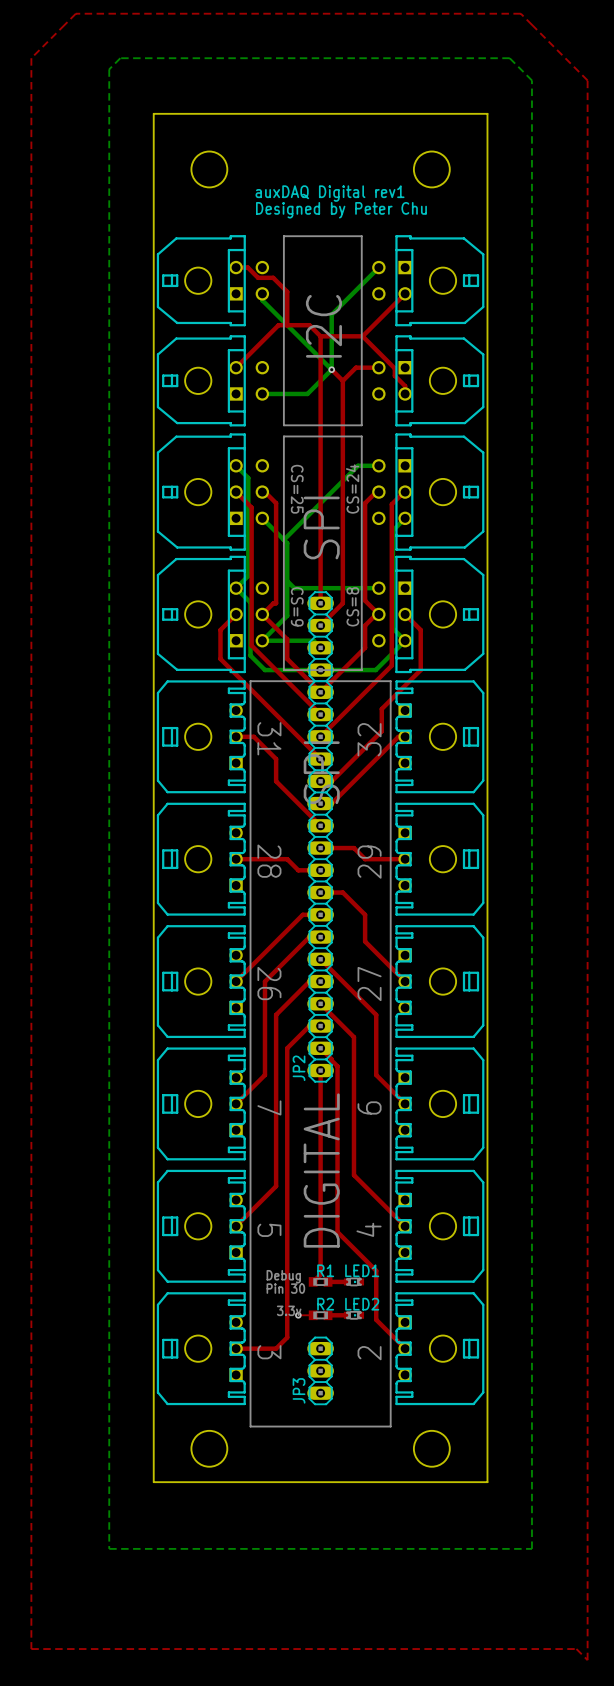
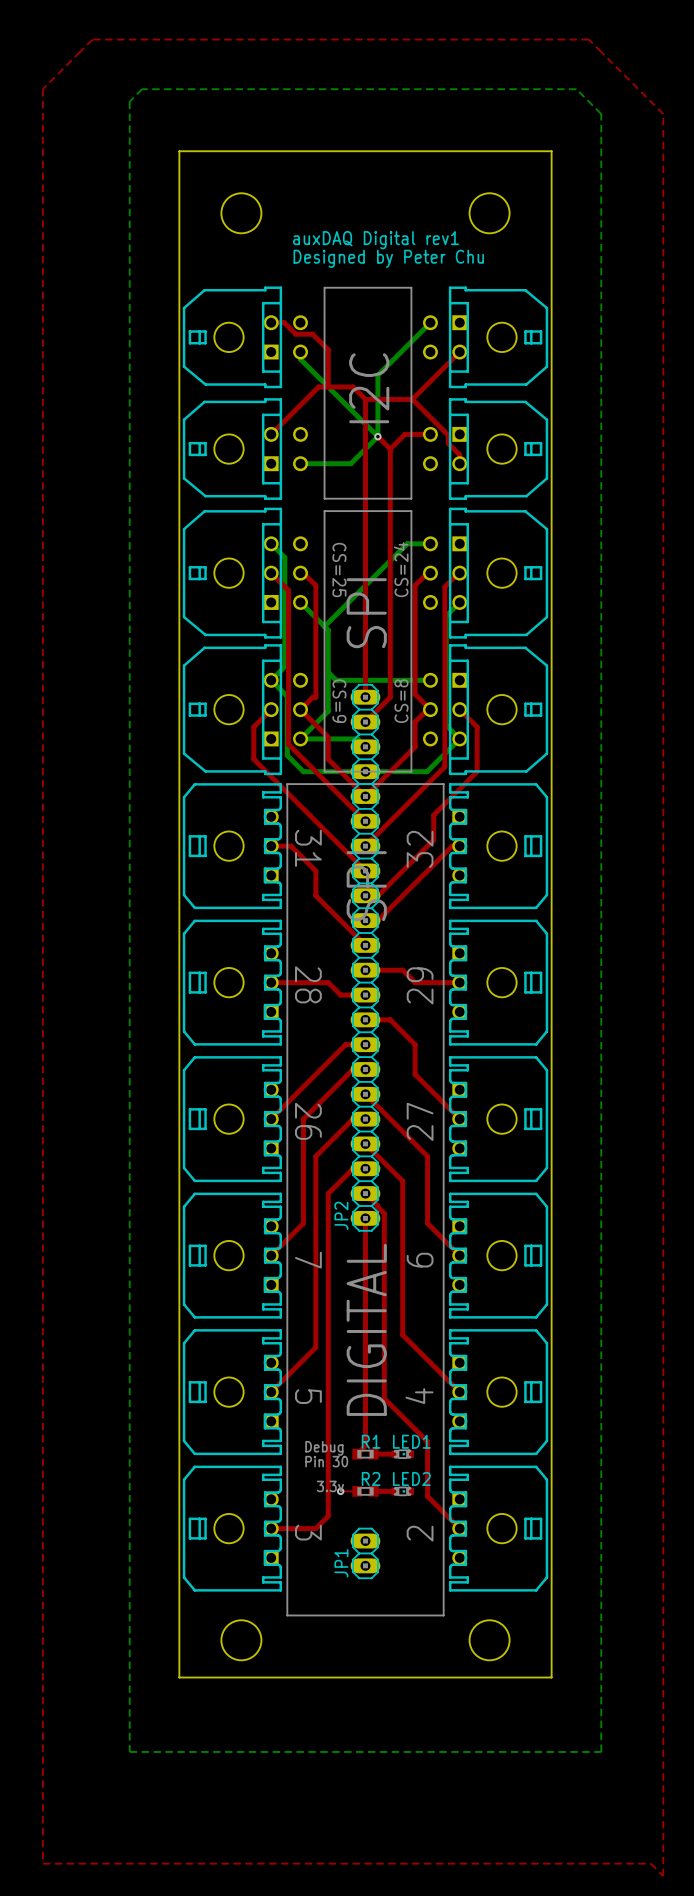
JP3: (320, 1370) -> none
JP1: none -> (365, 1553)

